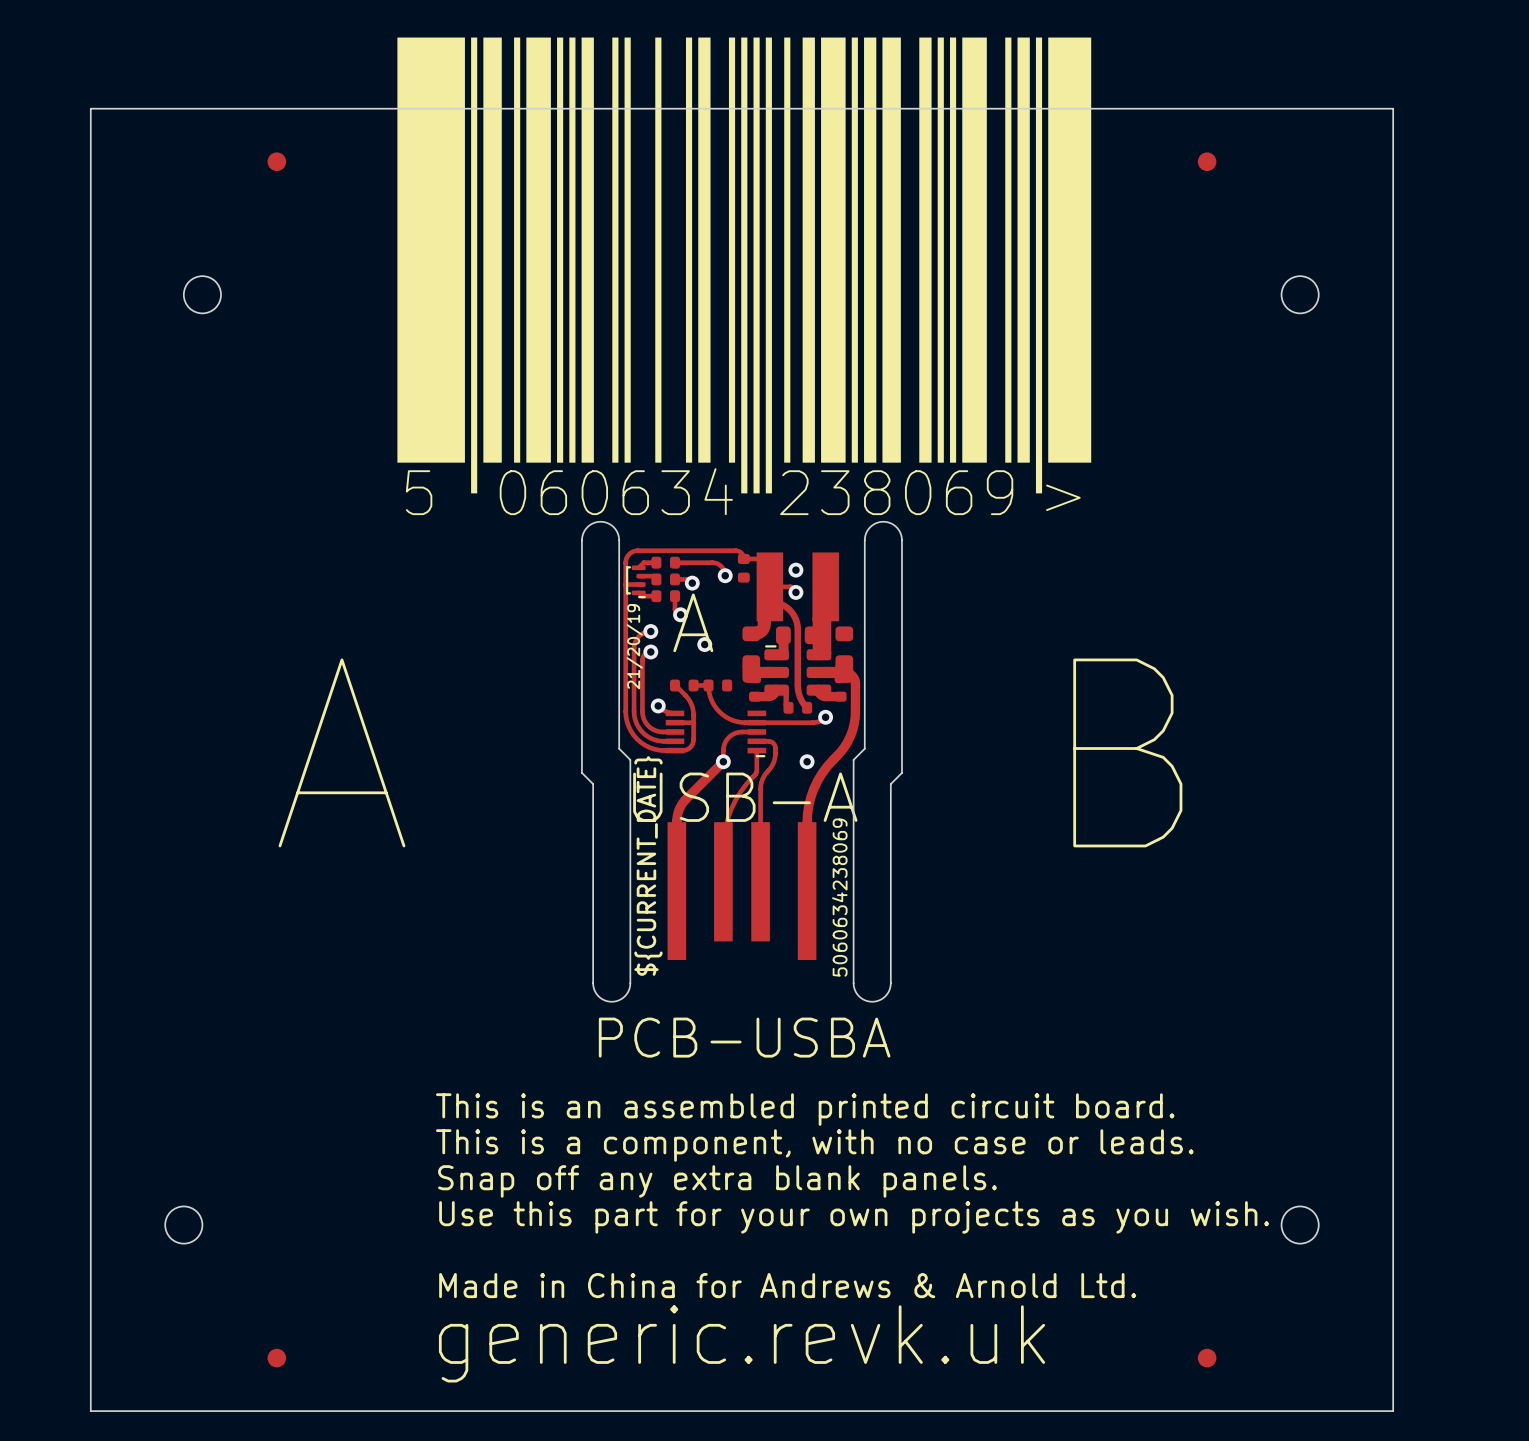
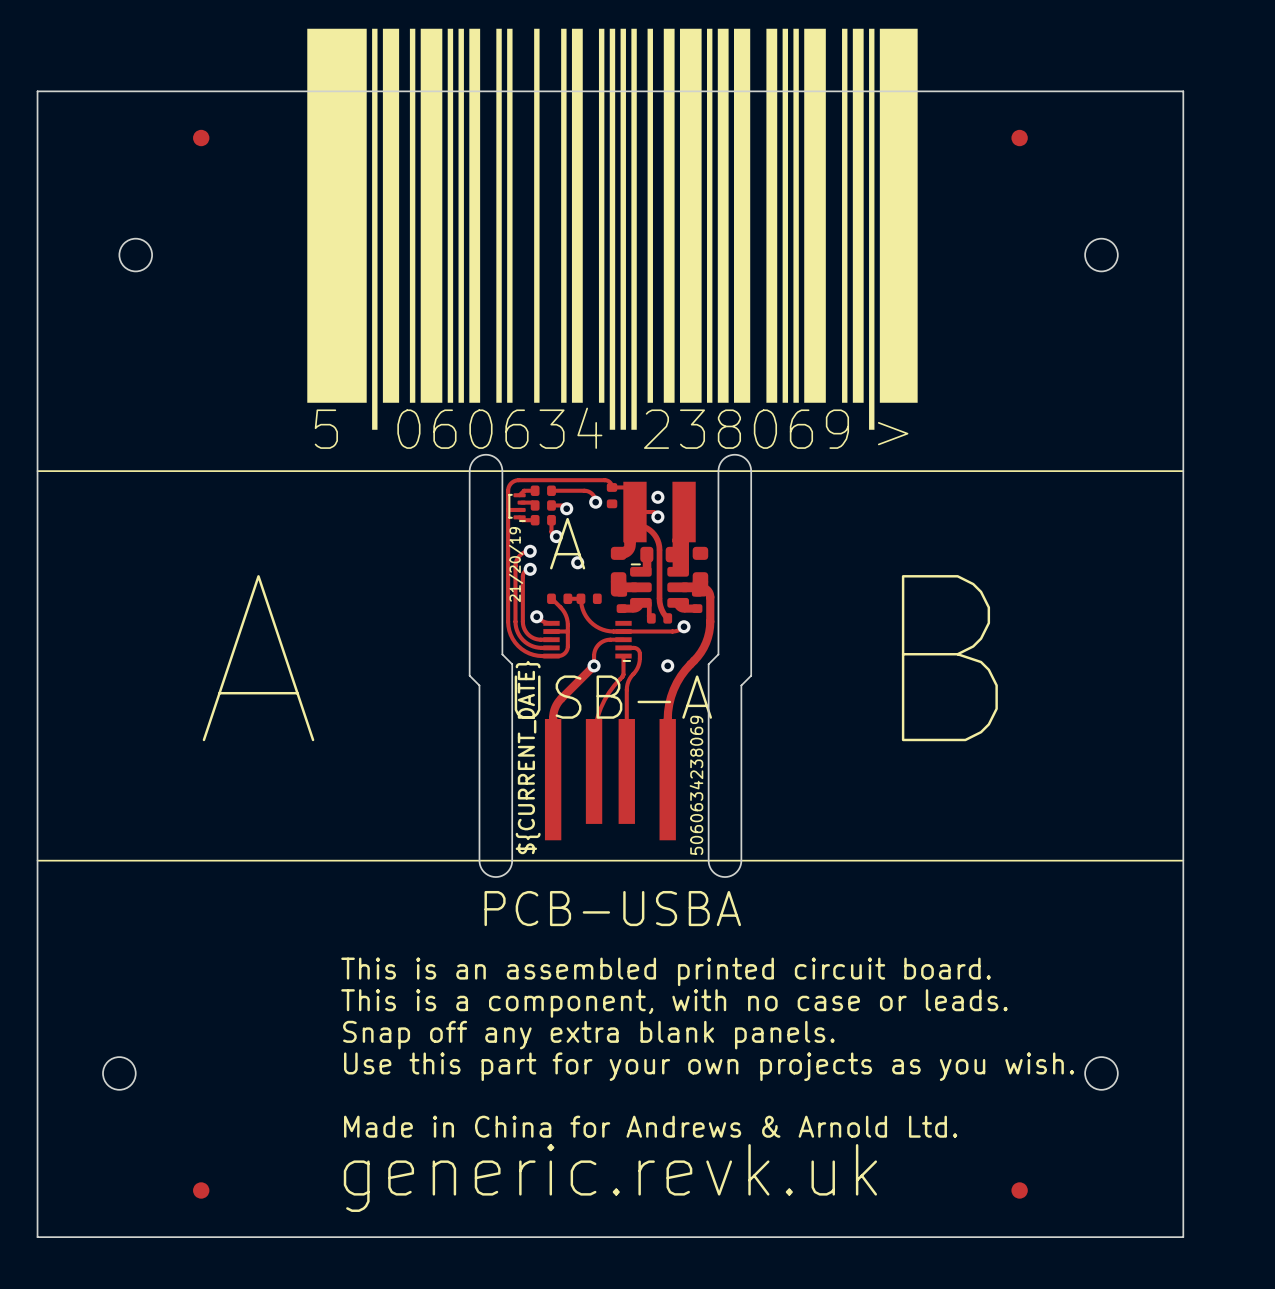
line: none -> (37, 471) (1183, 471)
line: none -> (37, 860) (1183, 860)

